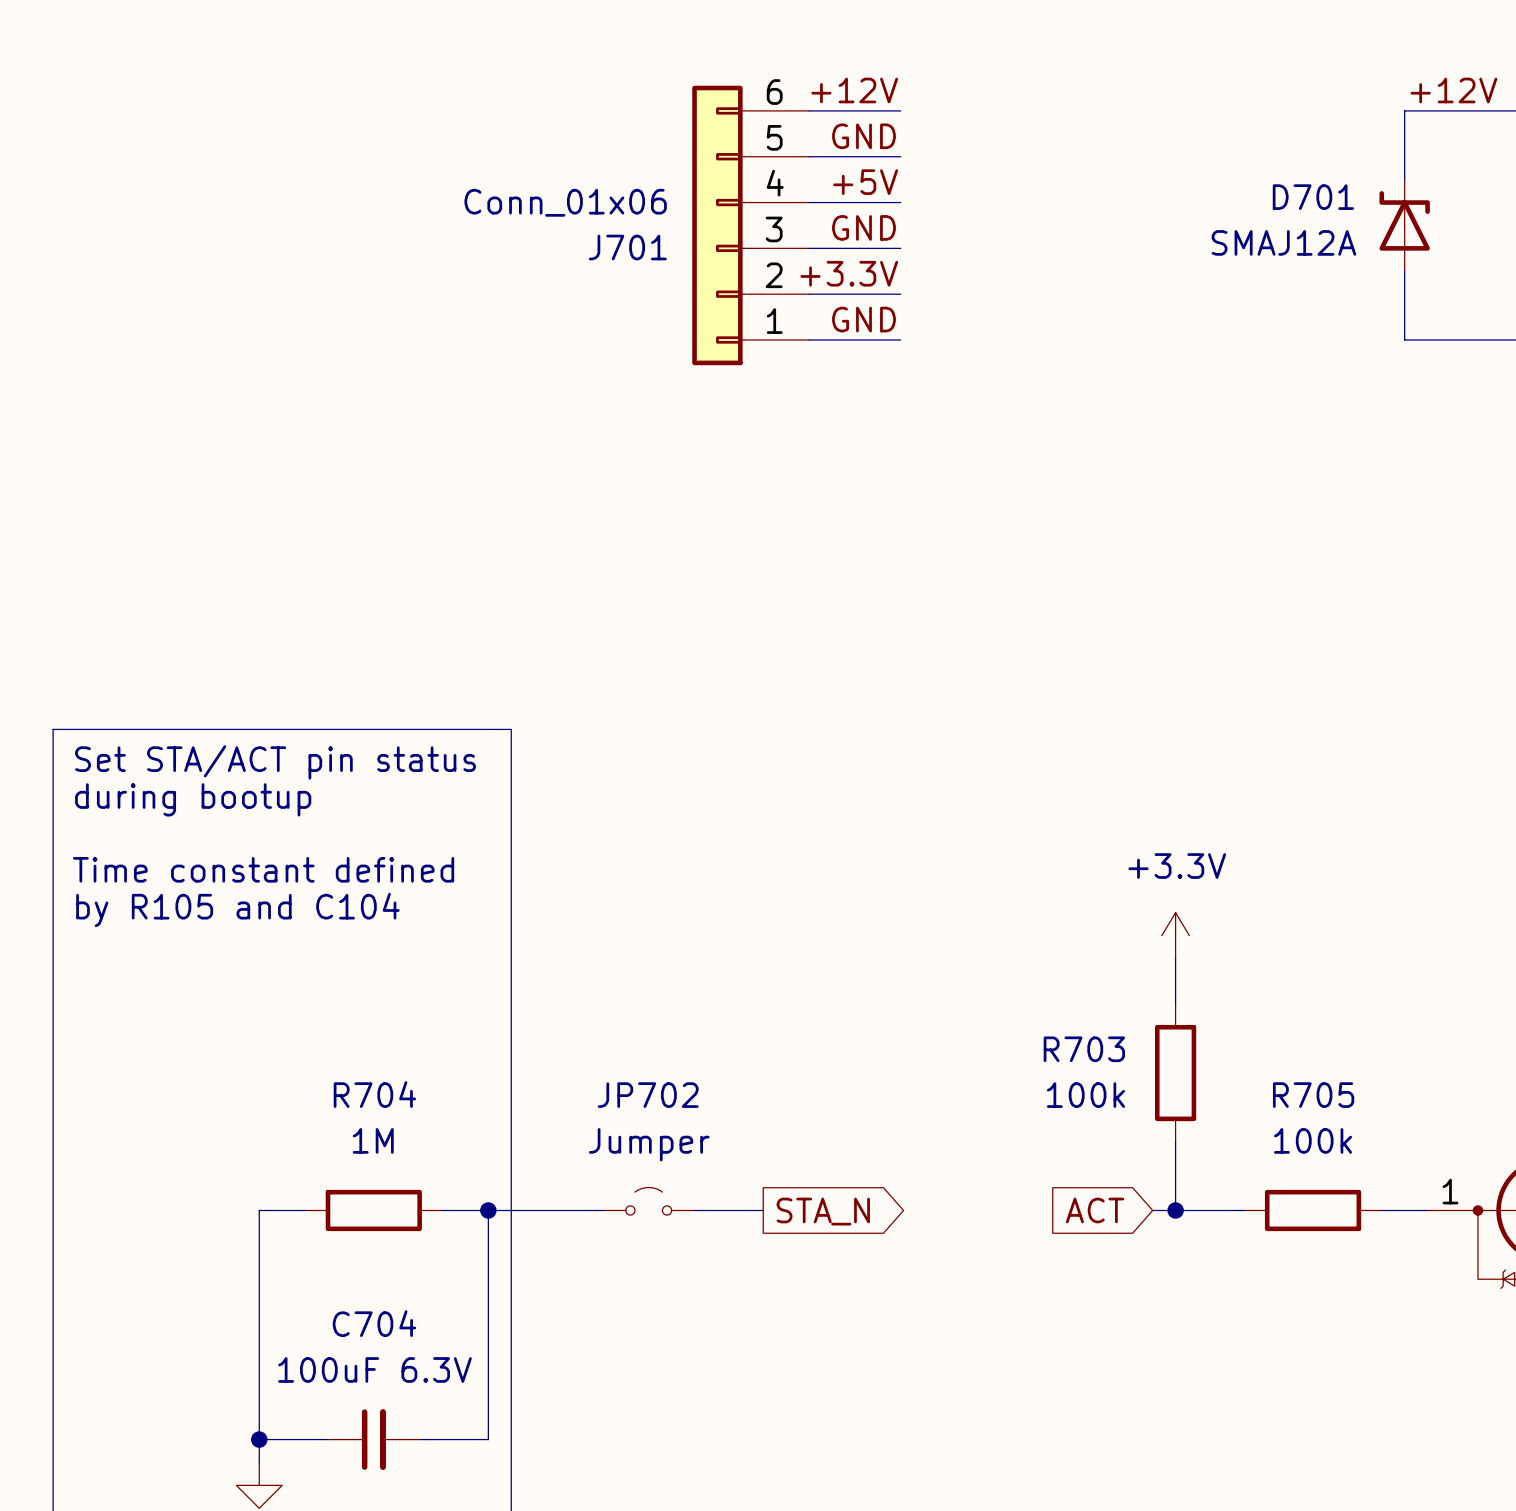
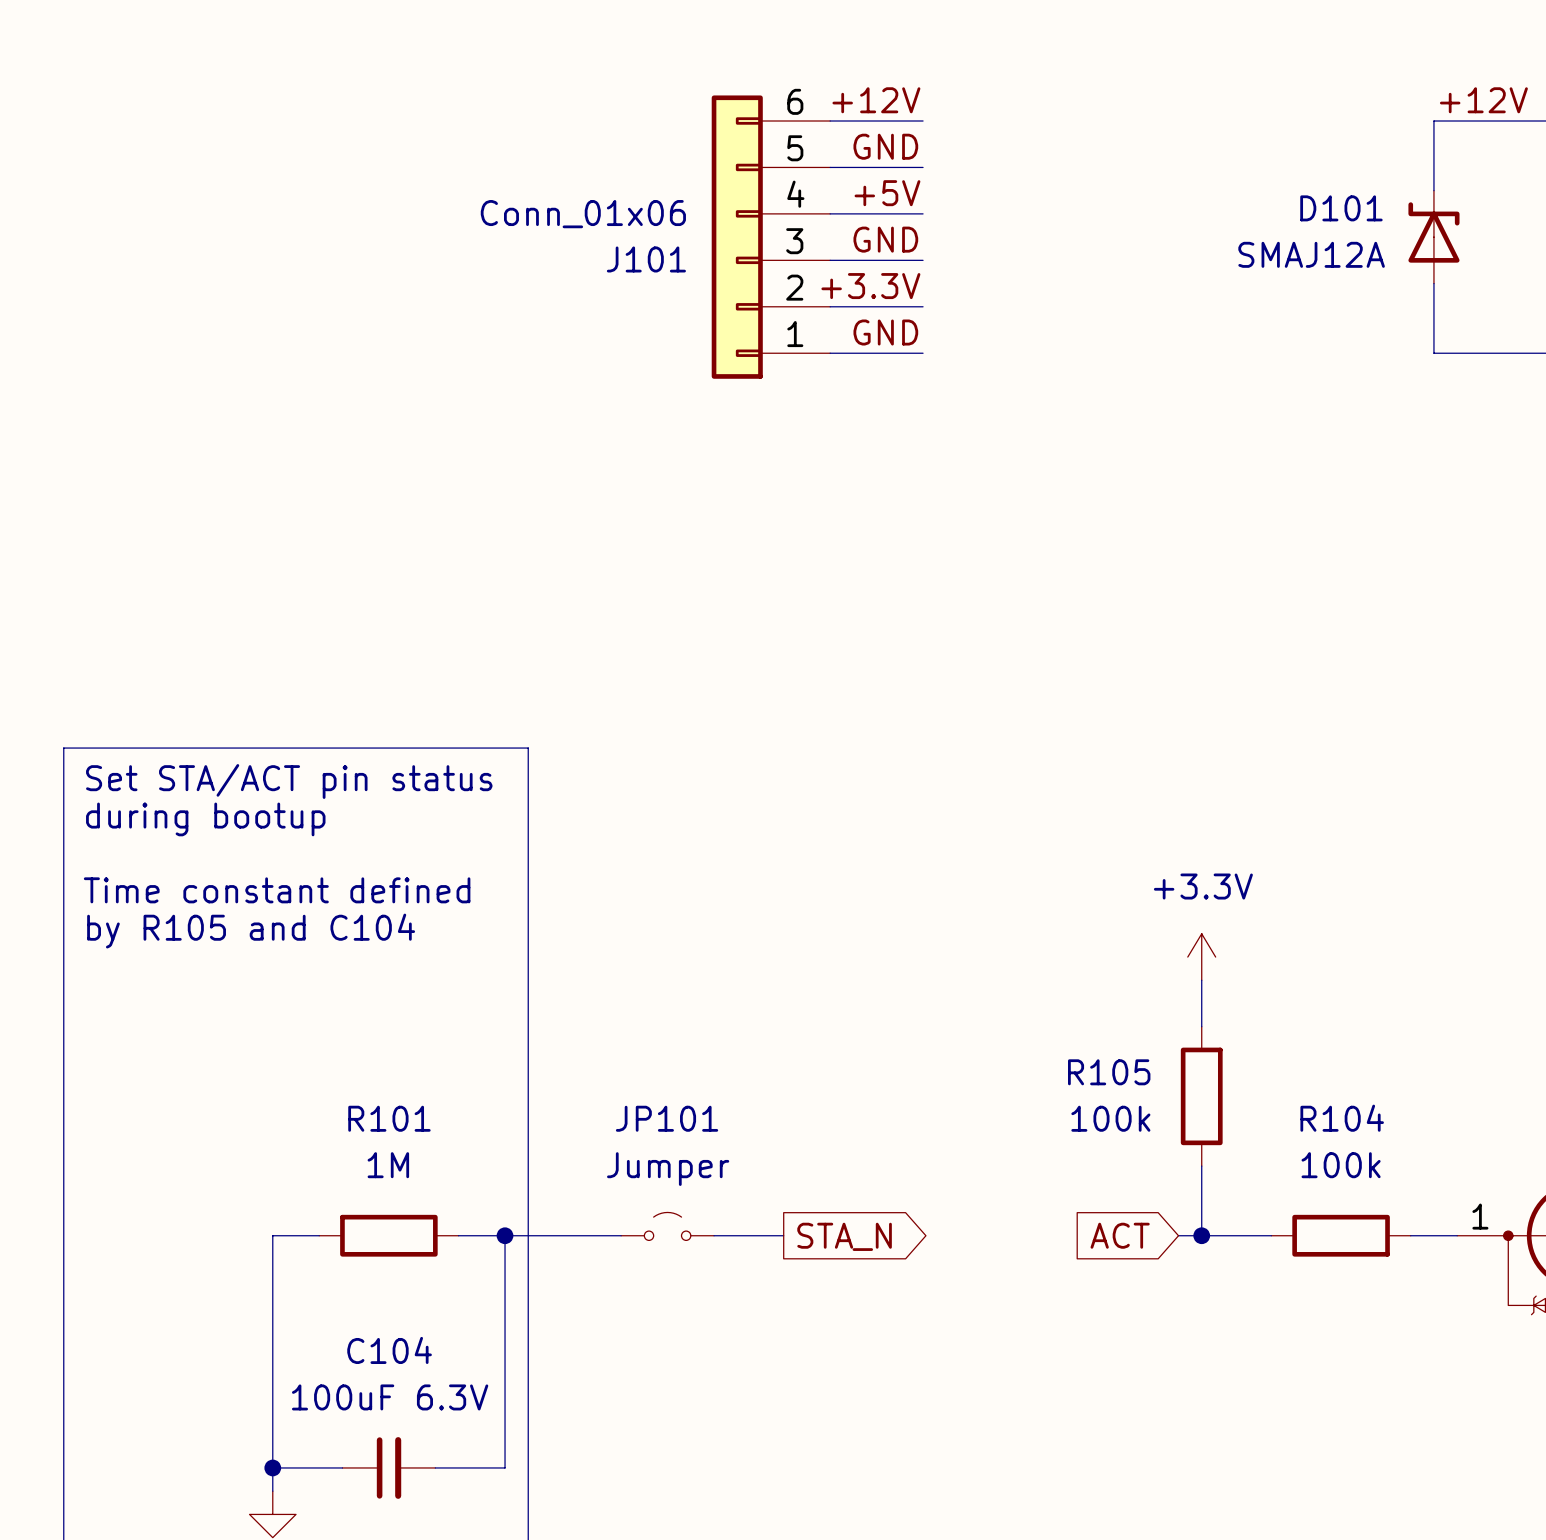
D701 name: D701 (1313, 197) -> D101 (1341, 208)
J701 name: J701 (627, 247) -> J101 (646, 259)
R703 name: R703 (1084, 1049) -> R105 (1109, 1072)
R704 name: R704 (374, 1094) -> R101 (389, 1118)
JP702 name: JP702 (648, 1095) -> JP101 (667, 1118)
R705 name: R705 (1313, 1095) -> R104 (1342, 1118)
C704 name: C704 (374, 1323) -> C104 (389, 1350)

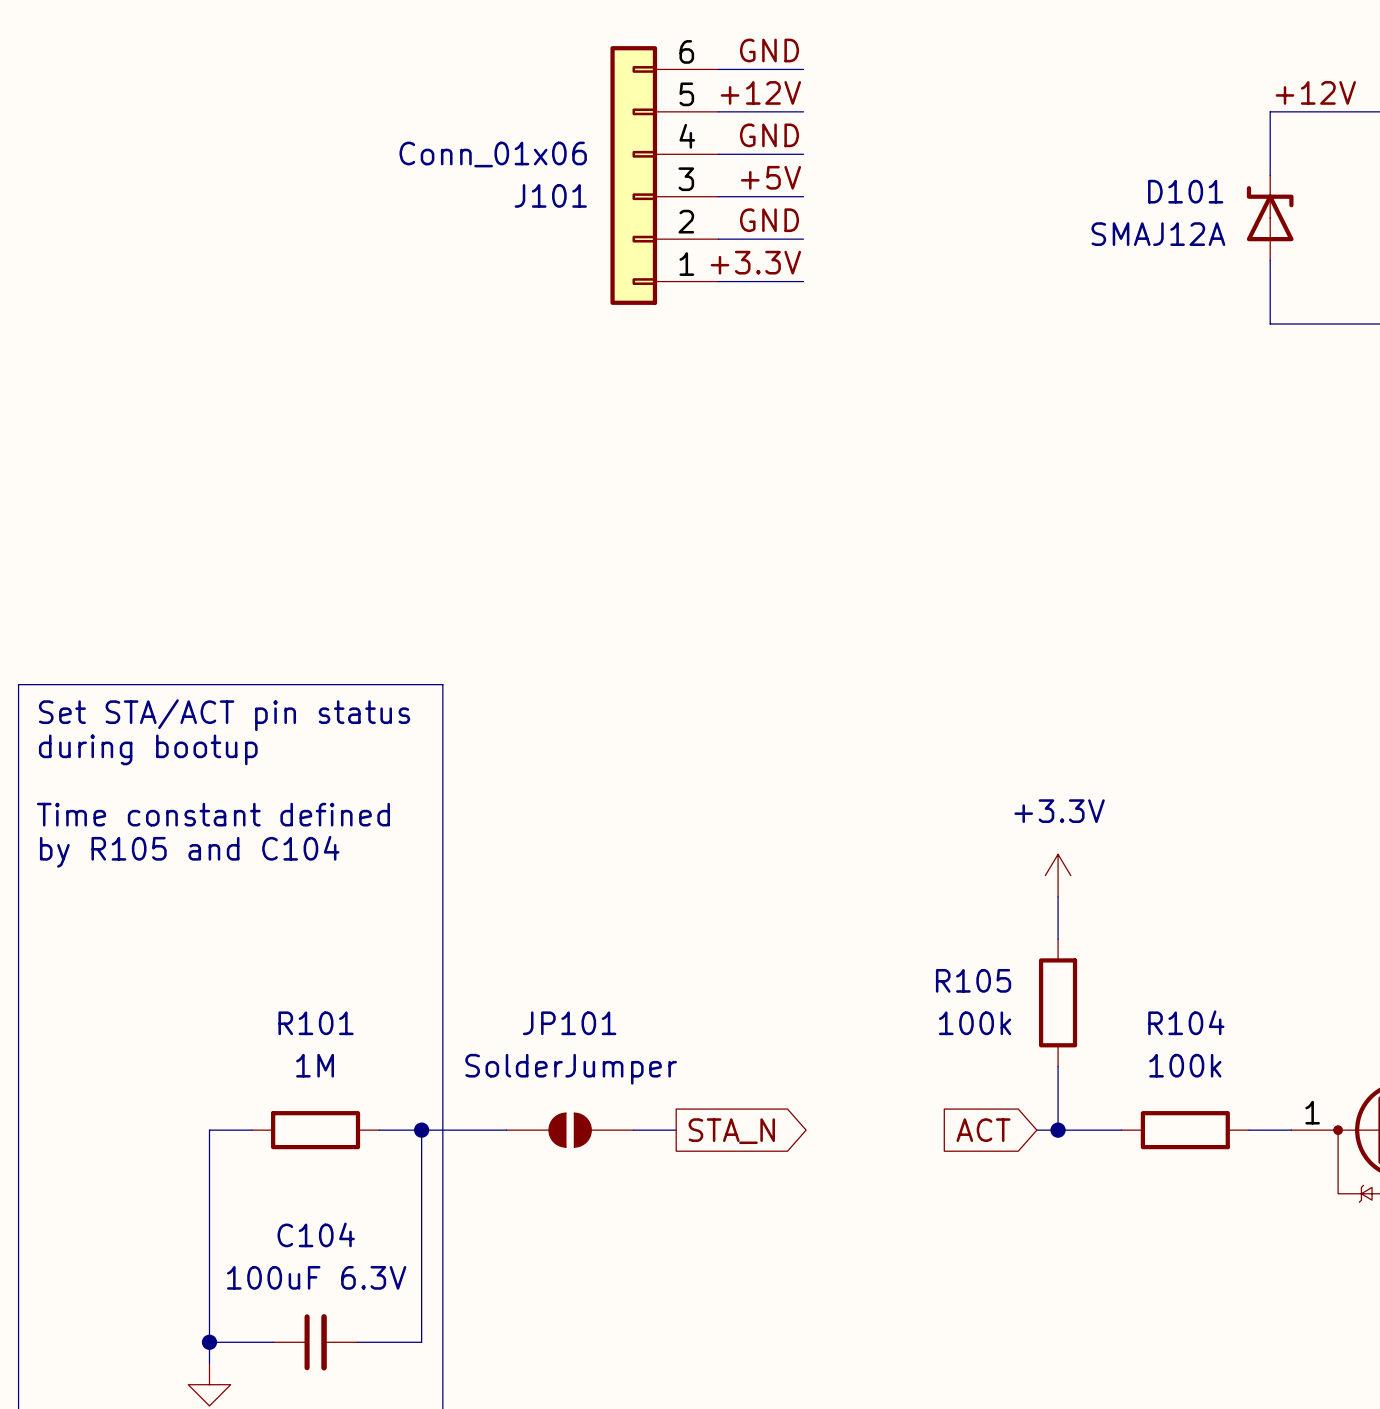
J101 position: (770, 237) -> (664, 175)
label position: GND (885, 332) -> GND (769, 50)
wire: (830, 353) (923, 353) -> (718, 69) (803, 69)
JP101 value: Jumper (668, 1169) -> SolderJumper (571, 1069)
JP101 symbol: [621, 1212, 715, 1241] -> [506, 1113, 634, 1148]

